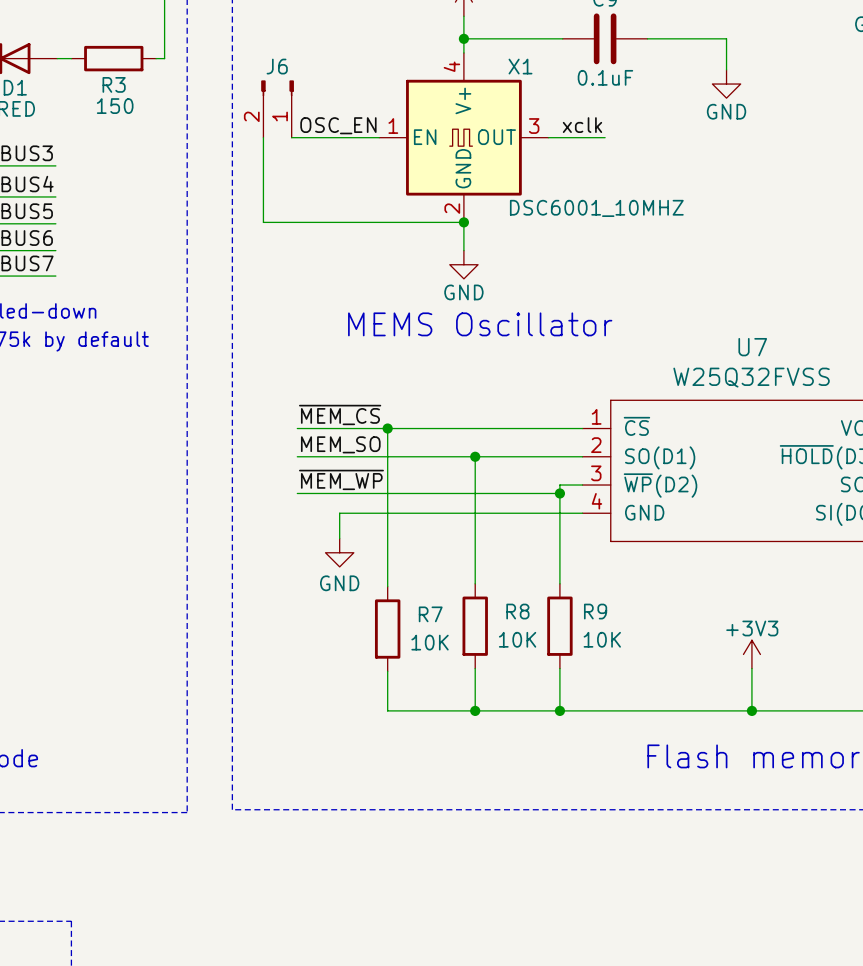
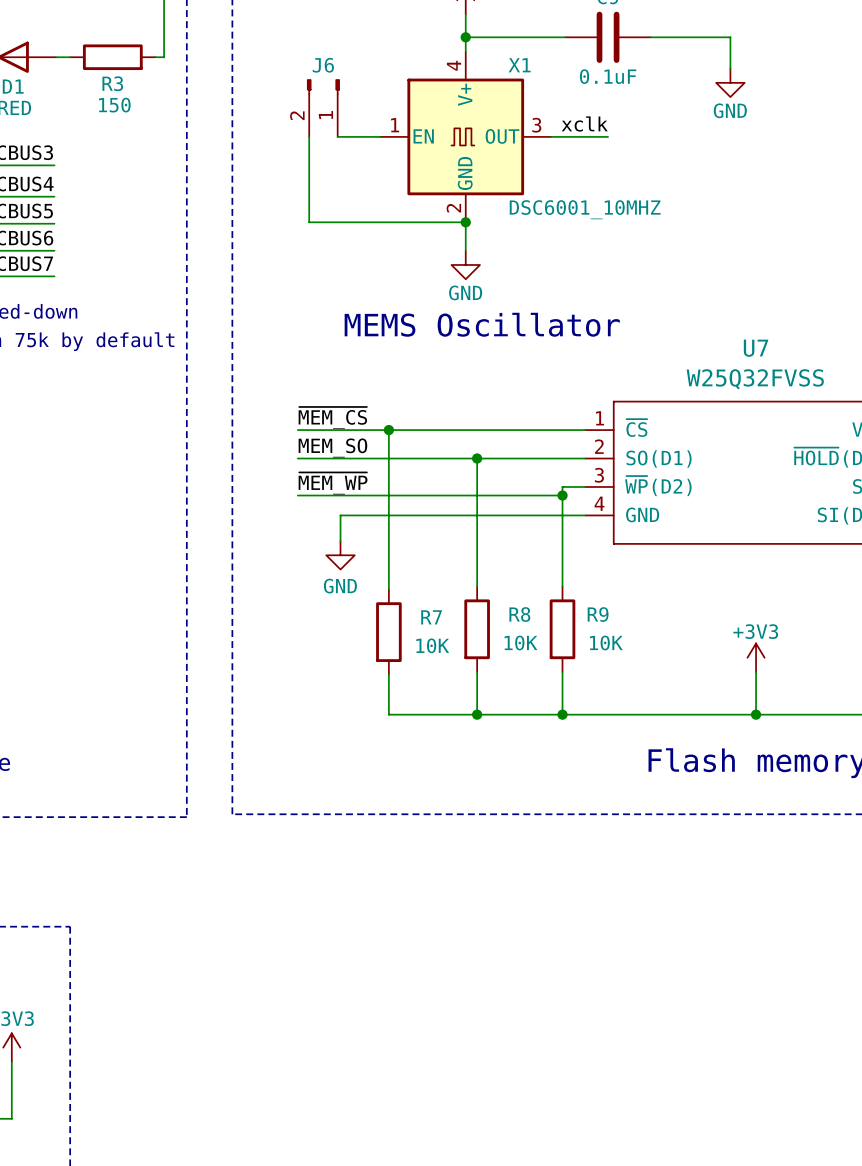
J6 position: (277, 109) -> (323, 108)
label: OSC_EN (338, 125) -> none
wire: (263, 137) (263, 222) (308, 222) -> (309, 136) (309, 222)
wire: (291, 137) (336, 137) -> none

